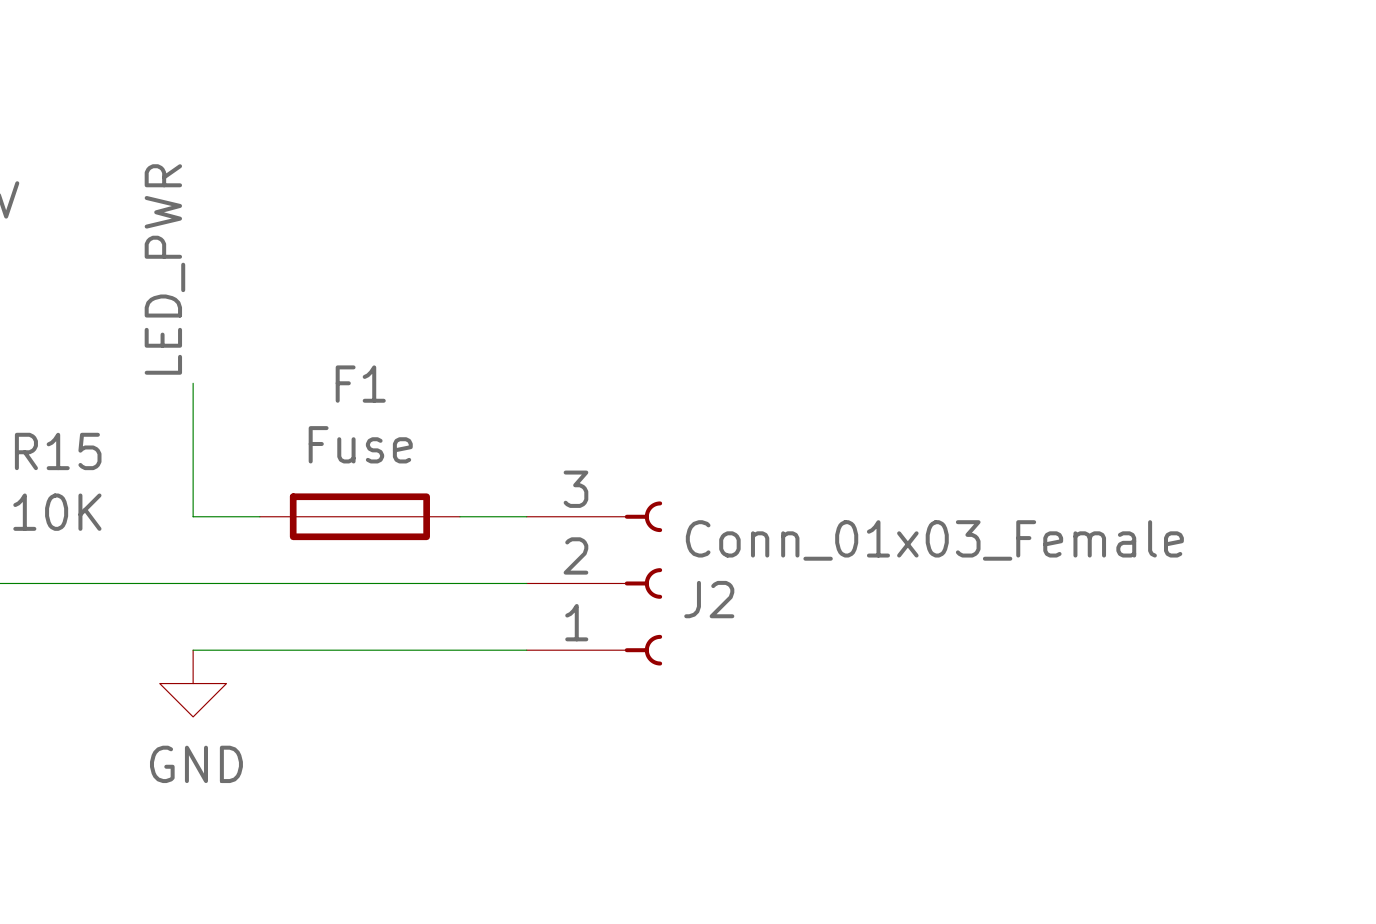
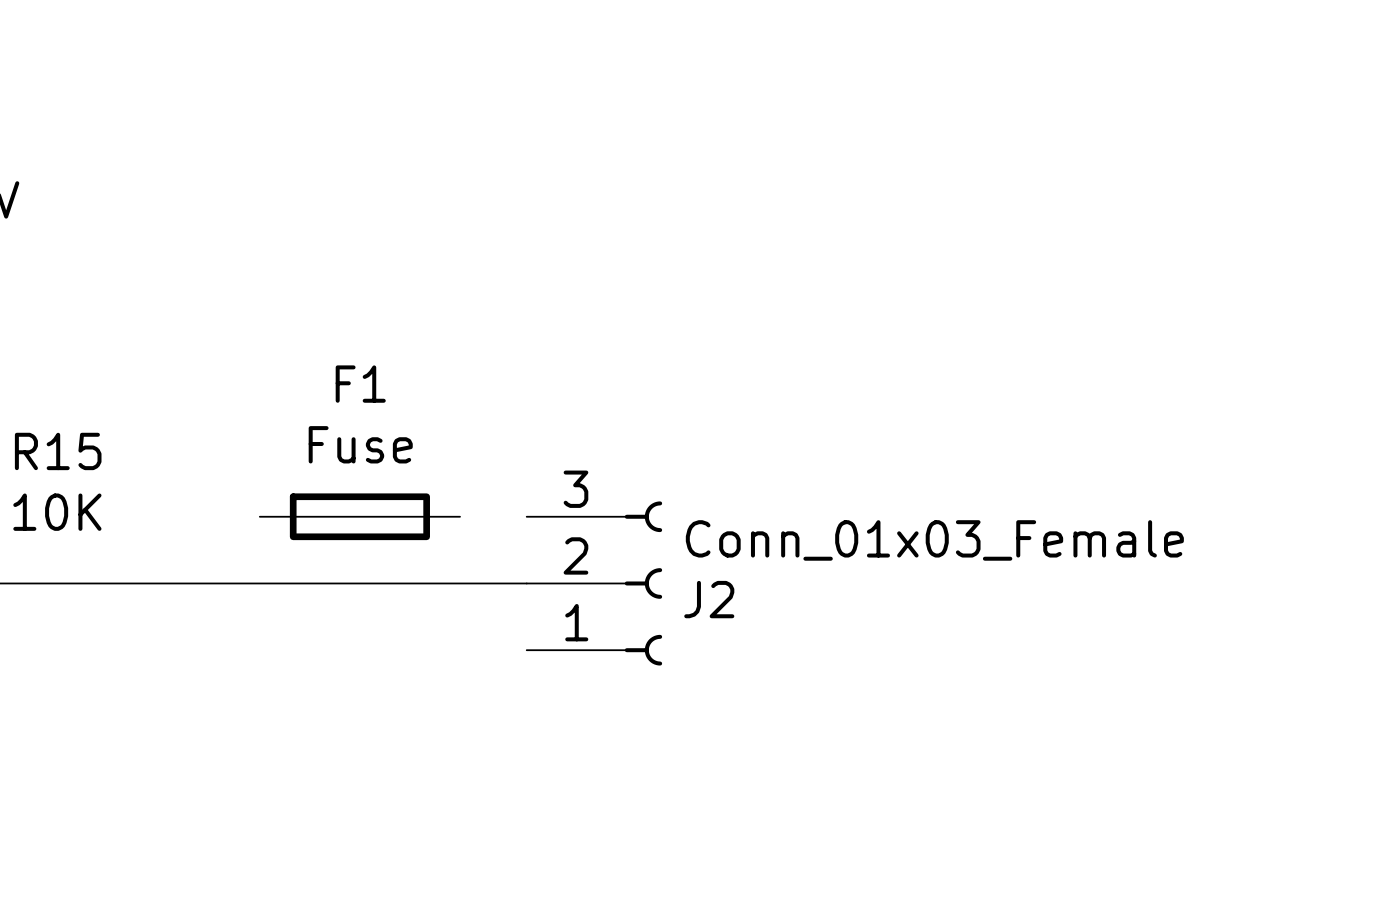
label: LED_PWR (164, 269) -> none
wire: (193, 383) (193, 516) (259, 516) -> none
wire: (460, 516) (526, 516) -> none
wire: (193, 650) (526, 650) -> none
power symbol: GND (193, 683) -> none

